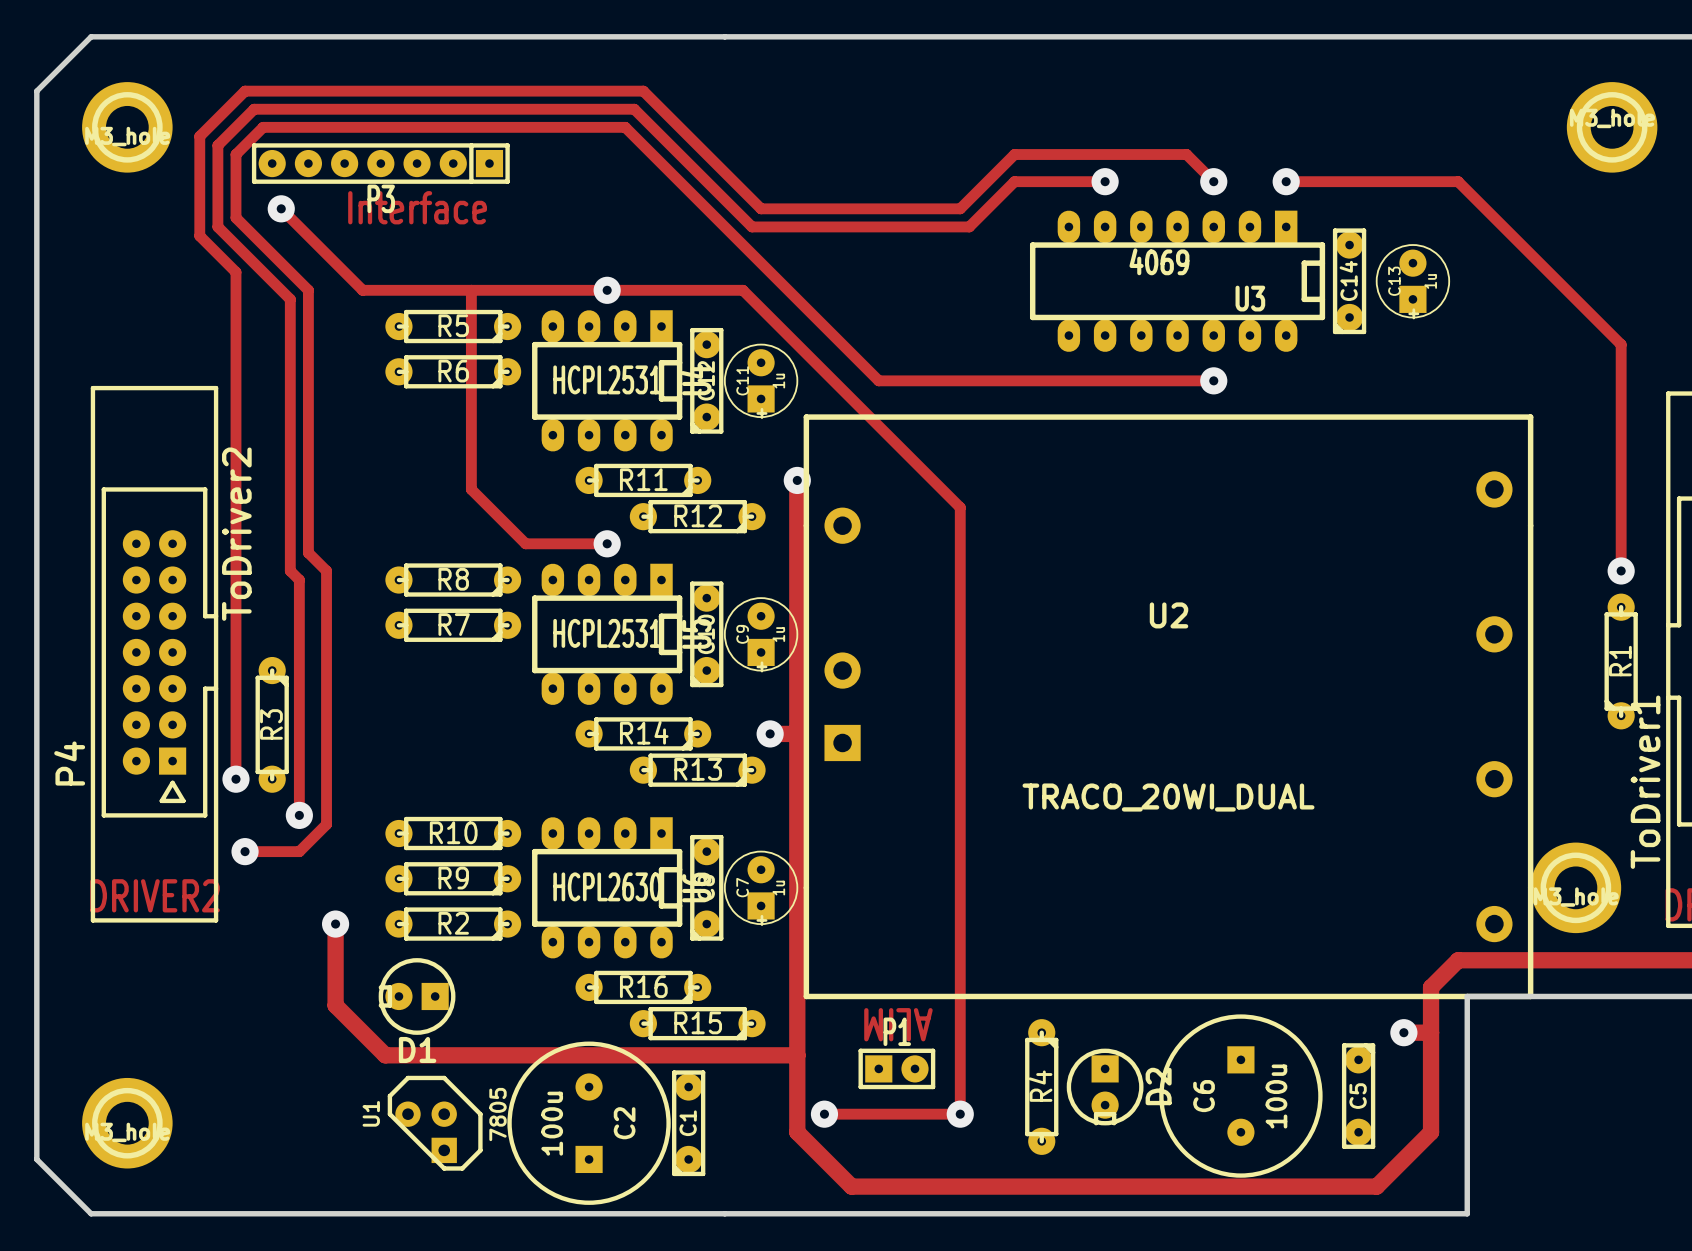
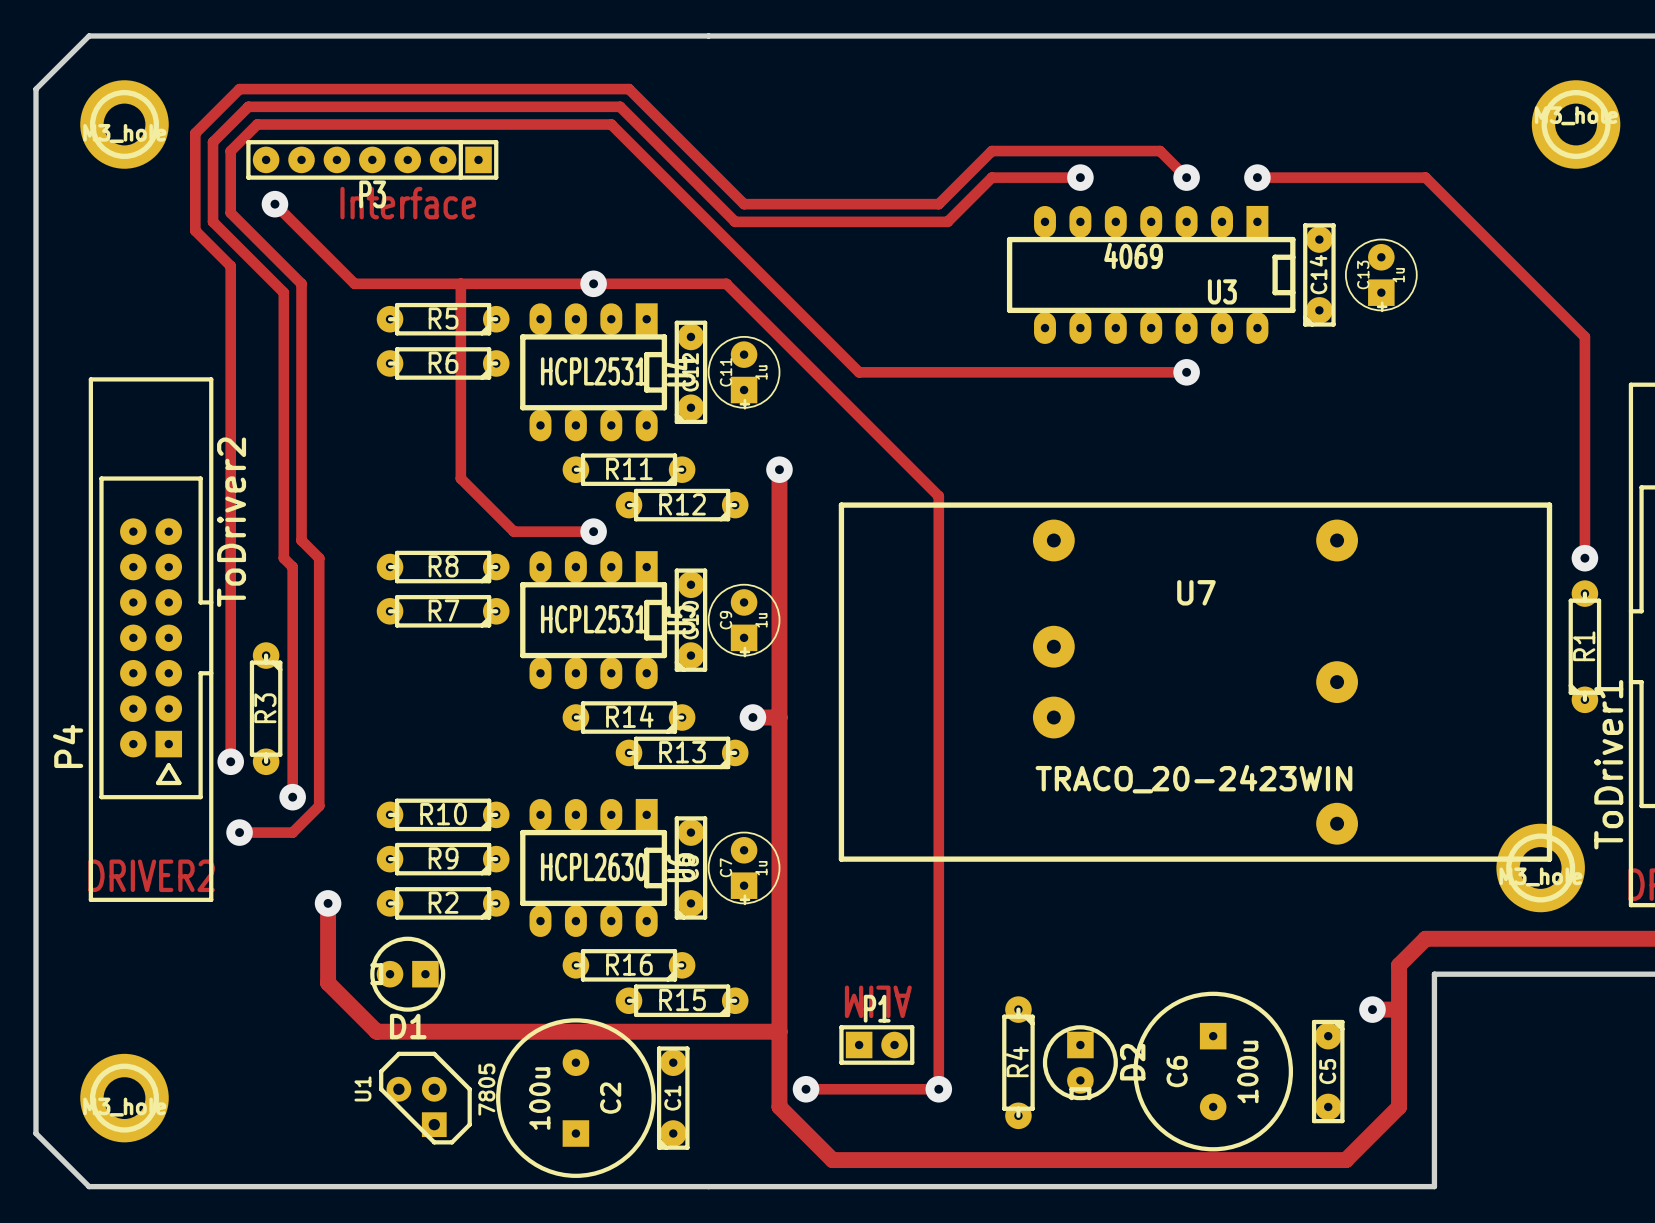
U7: none -> TRACO_20-2423WIN (1195, 682)
U2: TRACO_20WI_DUAL (1168, 706) -> none

